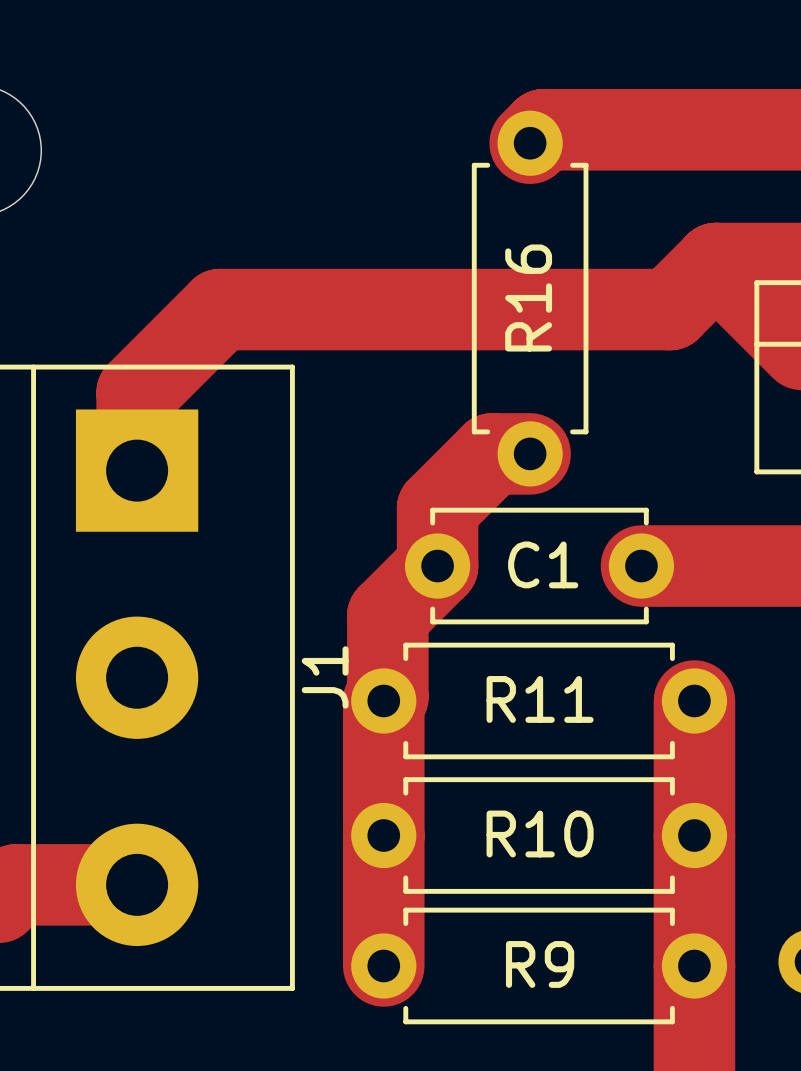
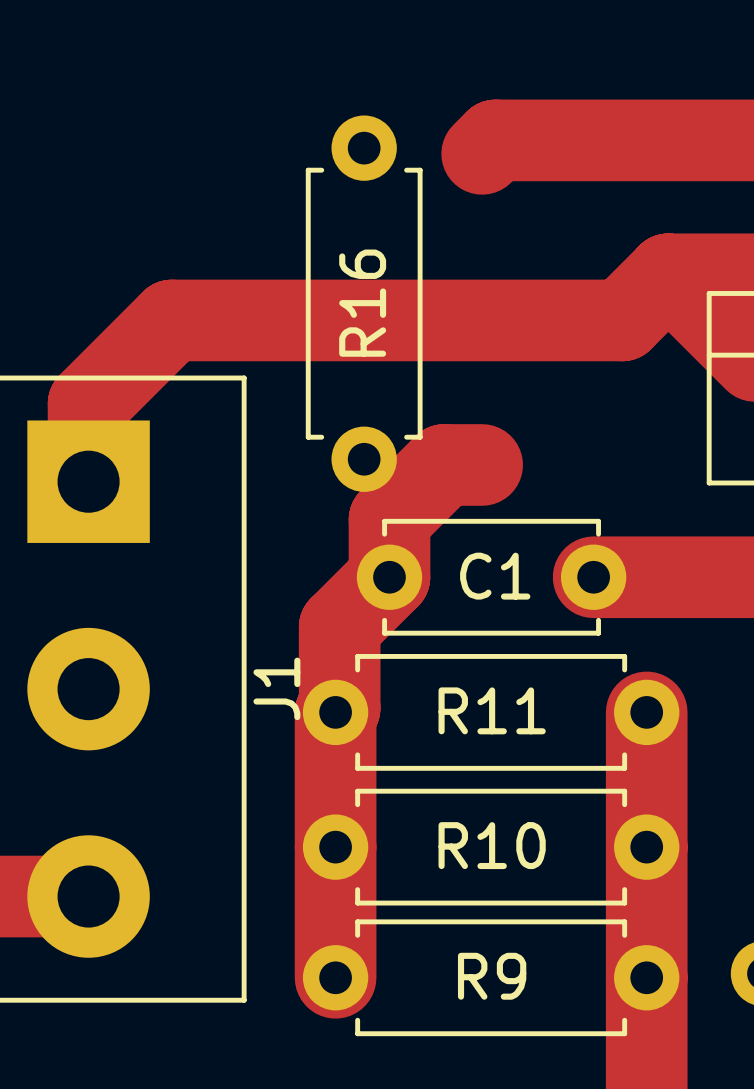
R16 position: (530, 298) -> (364, 303)

